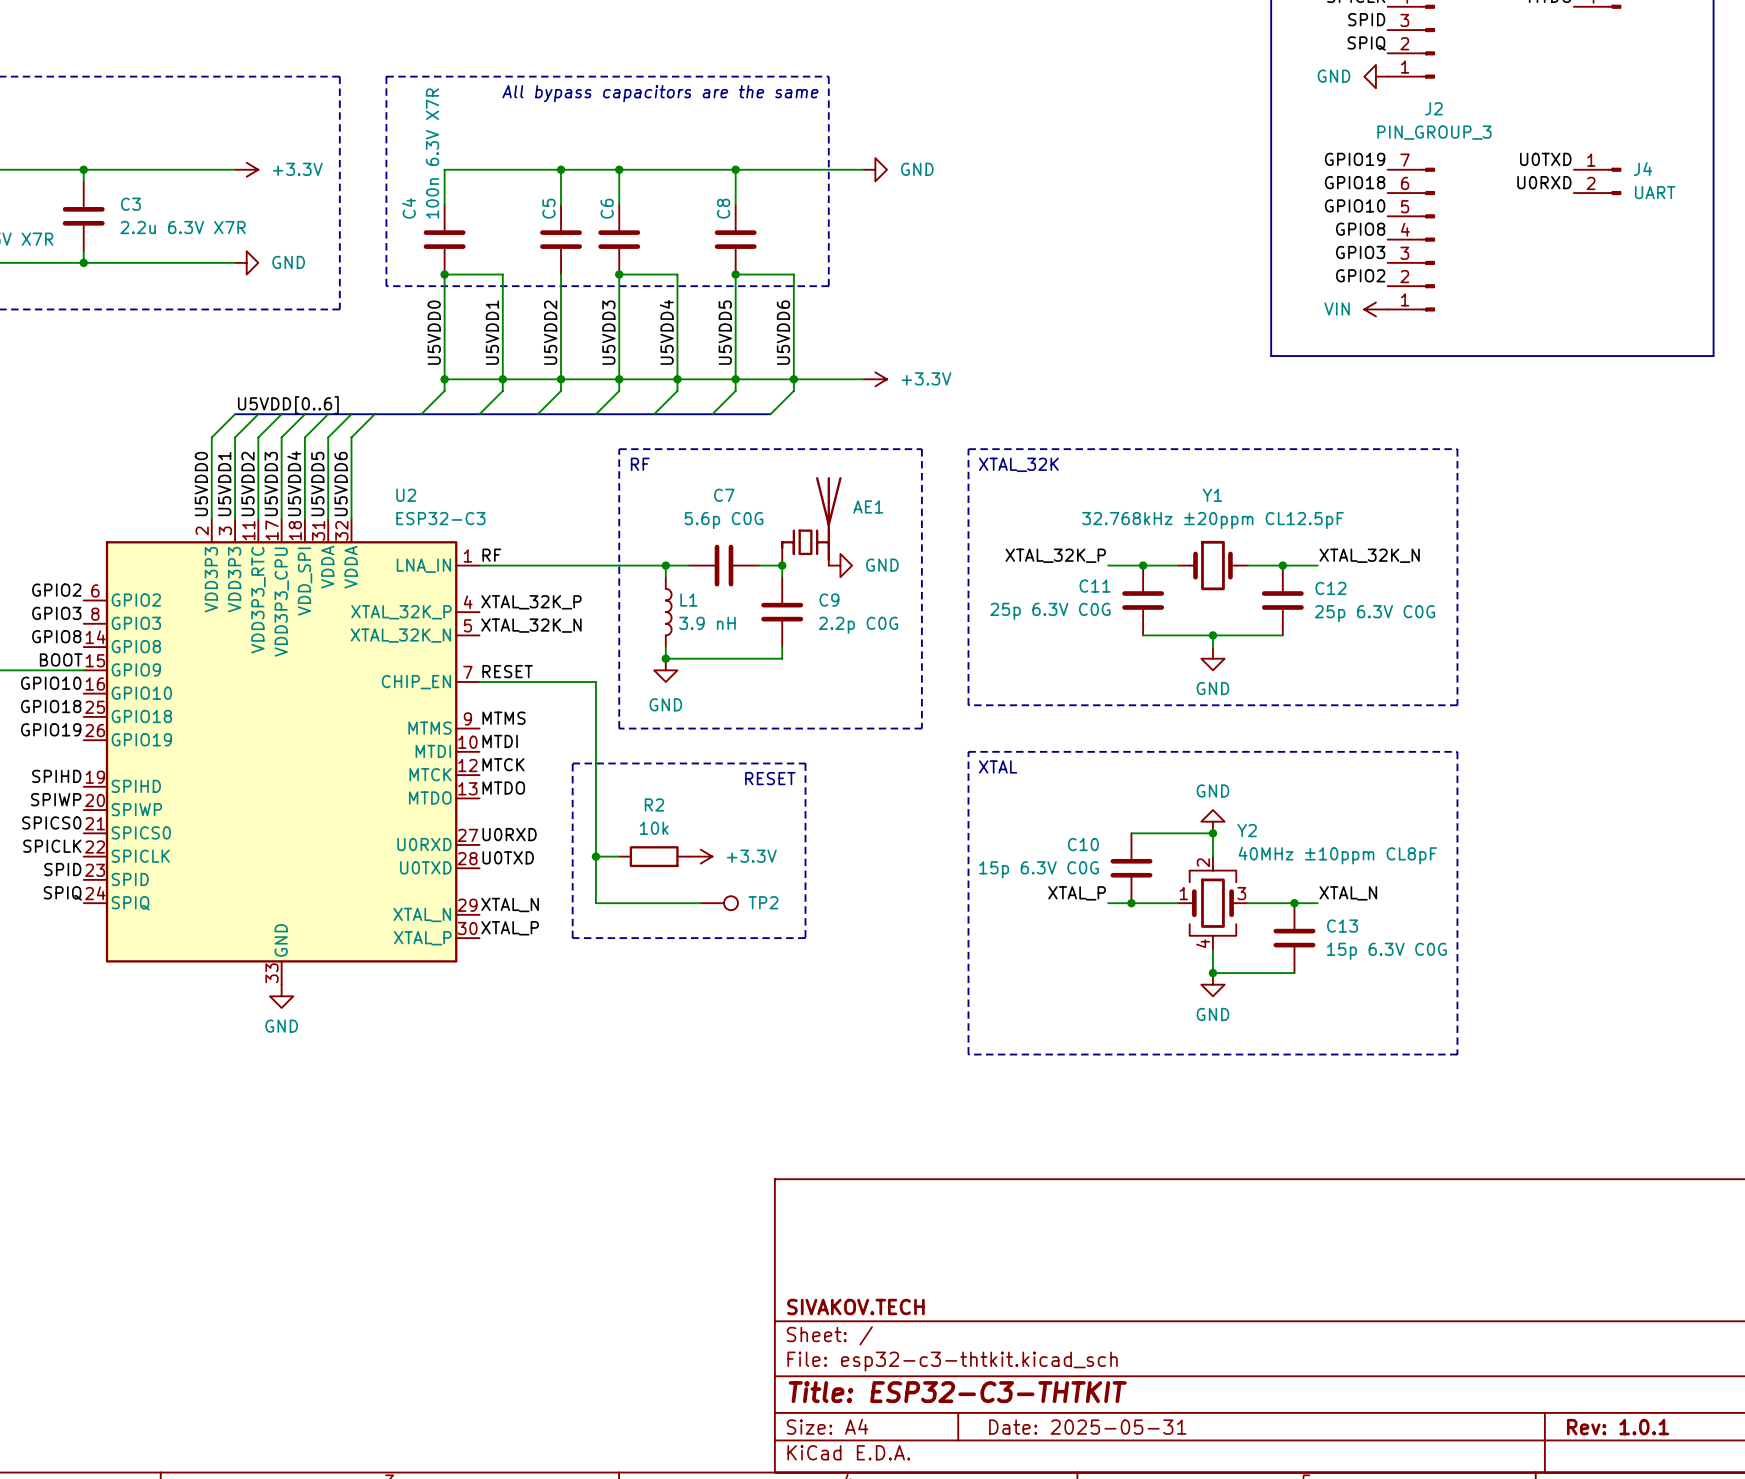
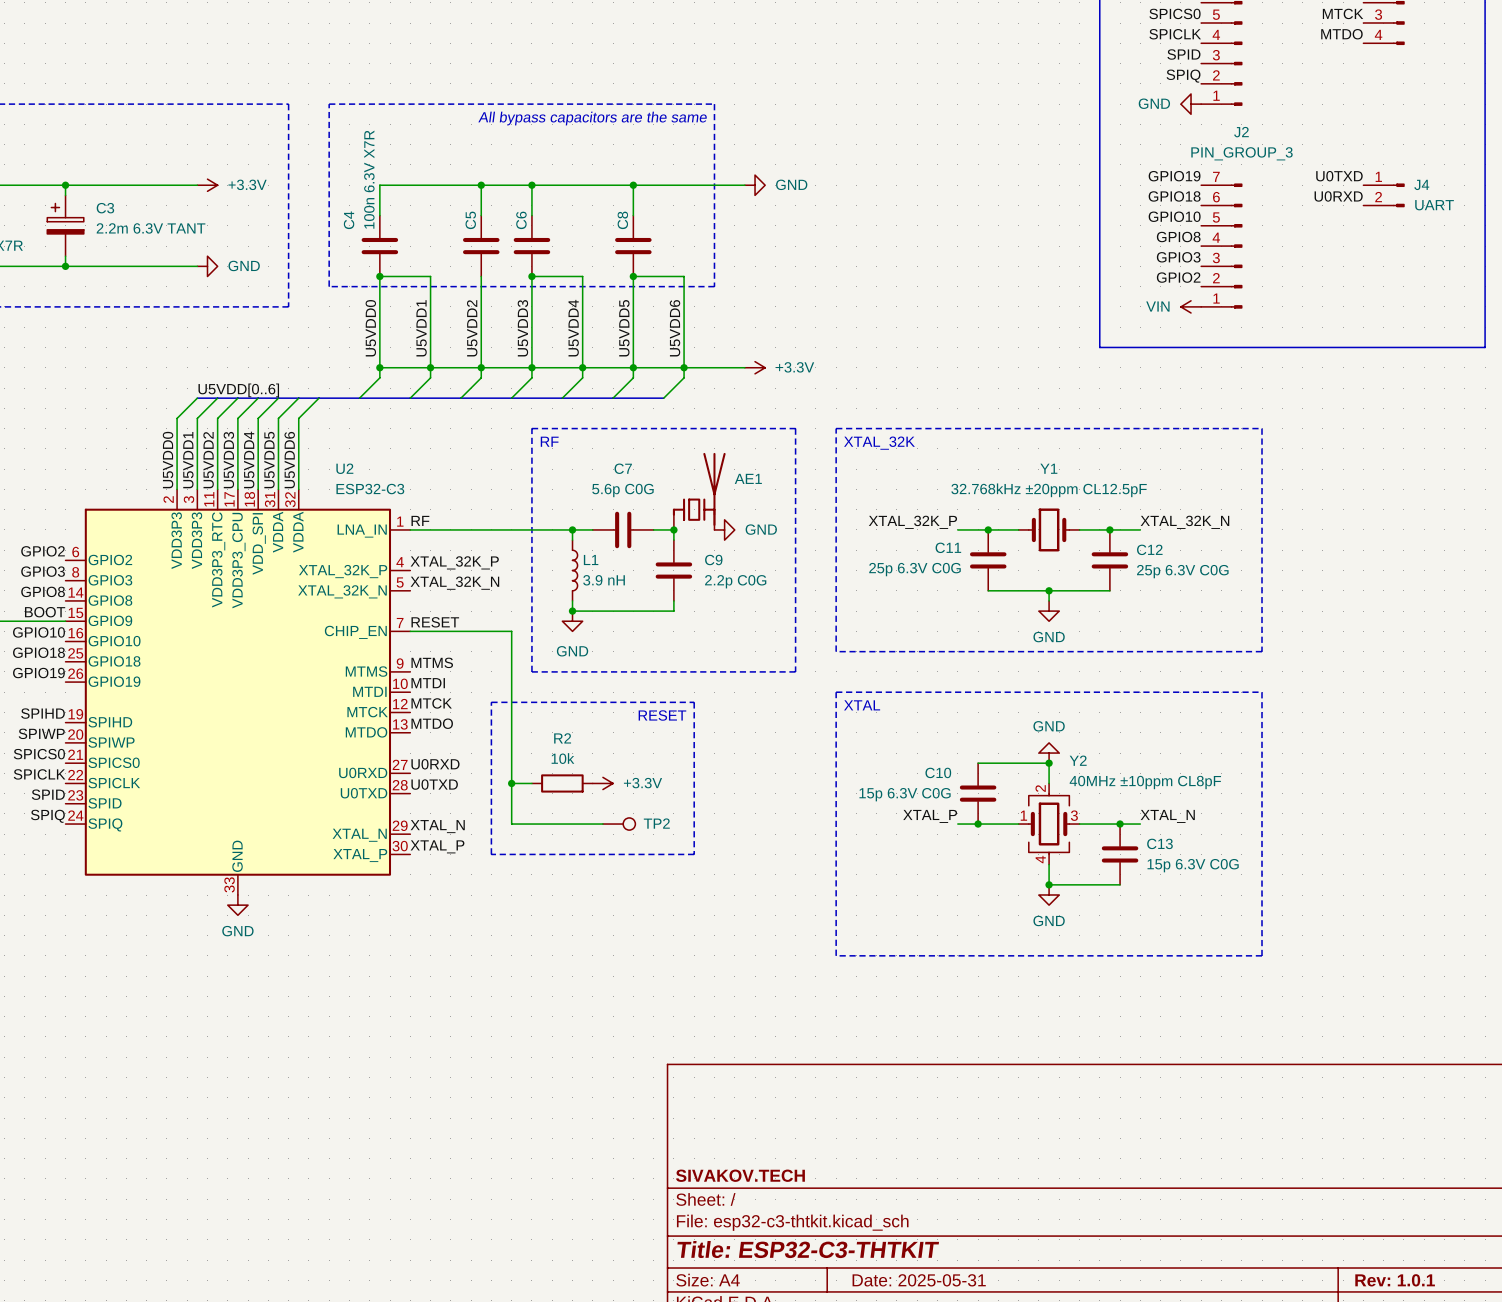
C3 symbol: [62, 181, 105, 252] -> [47, 195, 84, 257]
C3 value: 2.2u 6.3V X7R (183, 227) -> 2.2m 6.3V TANT (151, 228)

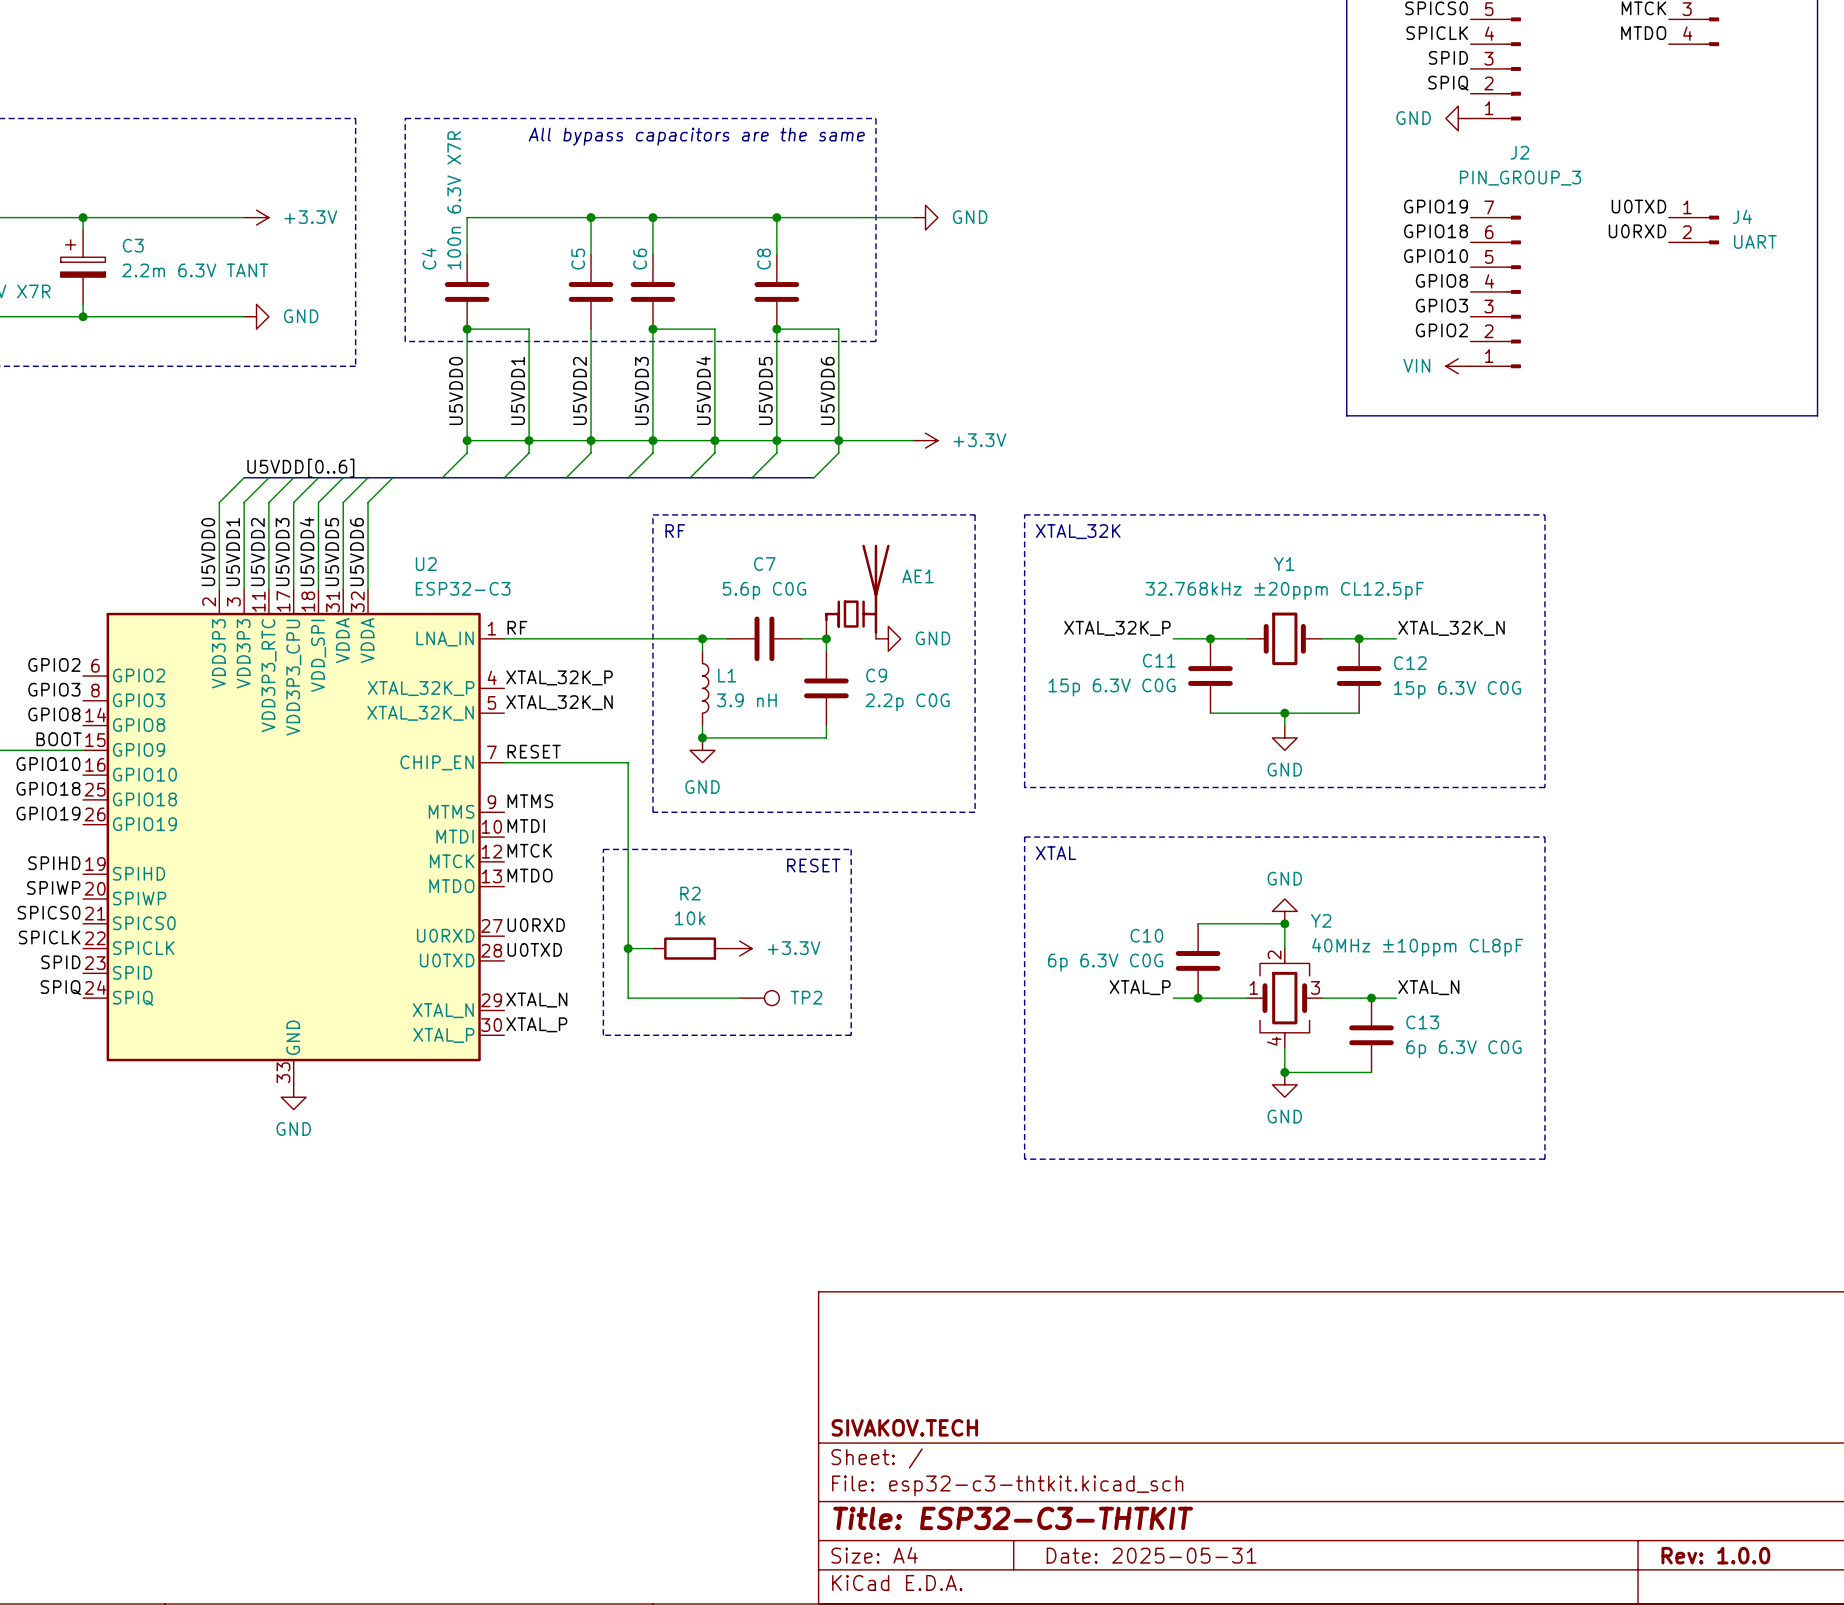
C11 value: 25p 6.3V C0G (914, 569) -> 15p 6.3V C0G (1112, 687)
C12 value: 25p 6.3V C0G (1182, 571) -> 15p 6.3V C0G (1457, 689)
C10 value: 15p 6.3V C0G (905, 794) -> 6p 6.3V C0G (1105, 962)
C13 value: 15p 6.3V C0G (1193, 865) -> 6p 6.3V C0G (1464, 1049)
title block: Rev: 1.0.1 (1395, 1280) -> Rev: 1.0.0 (1715, 1555)

